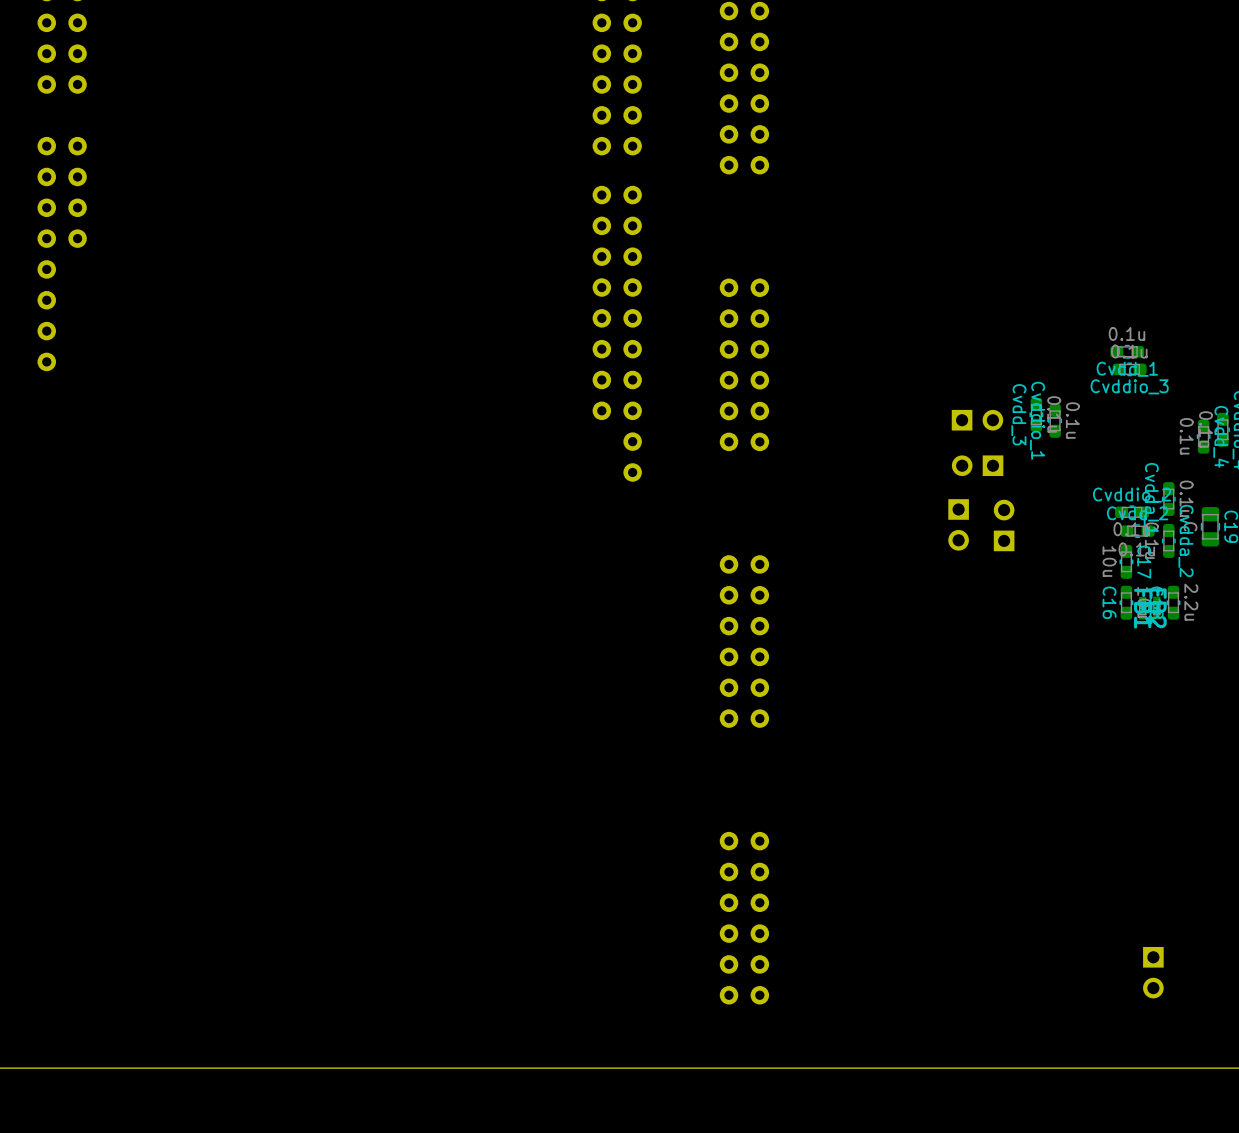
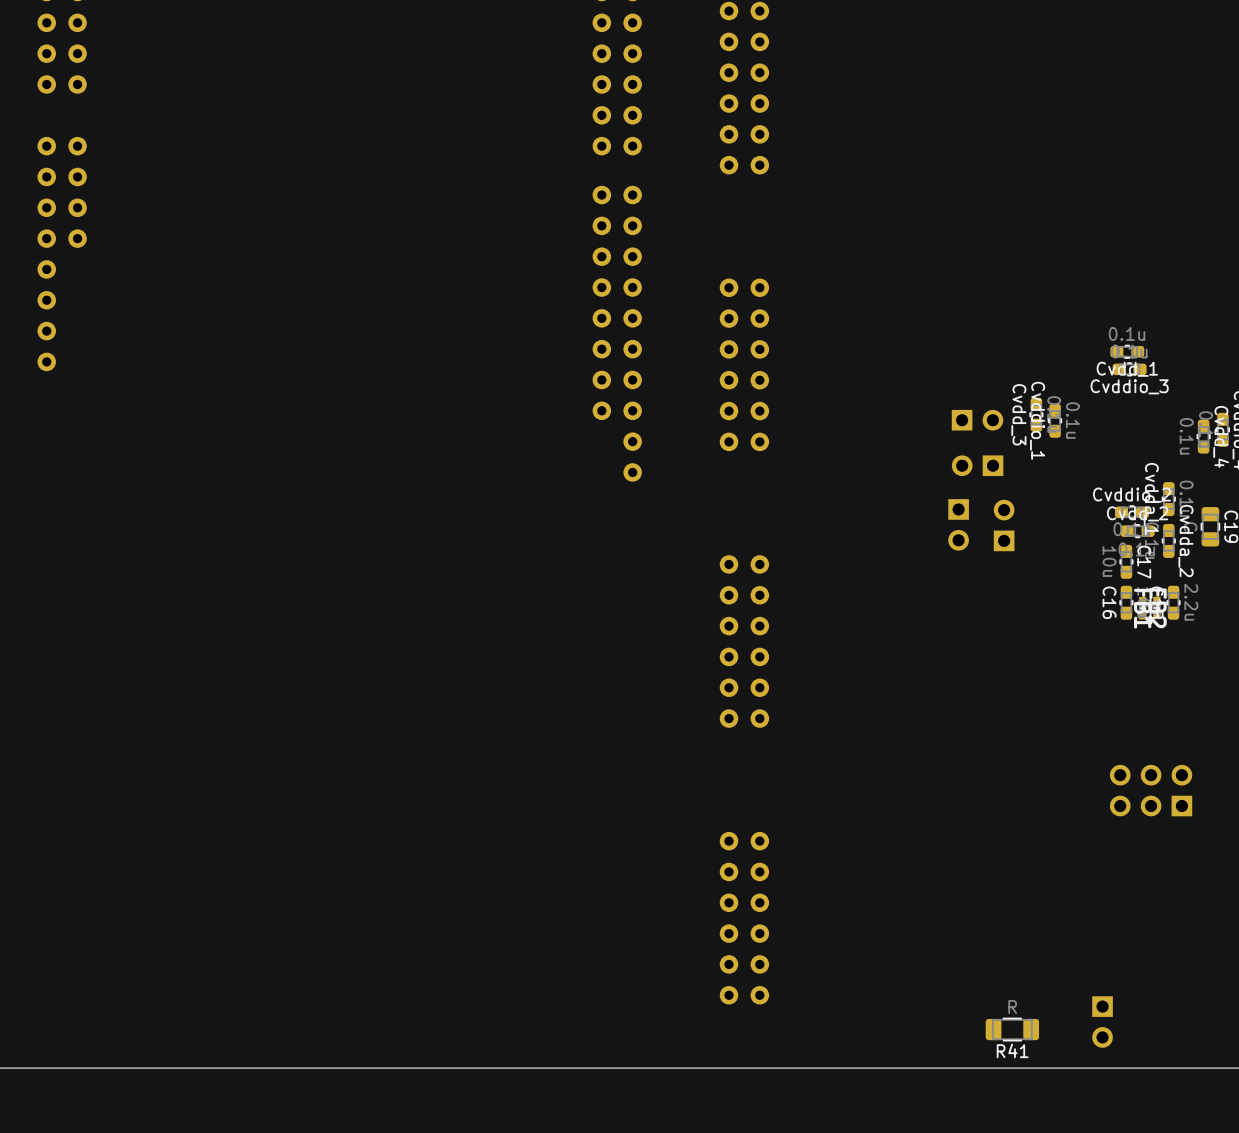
part: none -> (1151, 790)
part position: (1153, 972) -> (1102, 1022)
R41: none -> R (1012, 1029)

